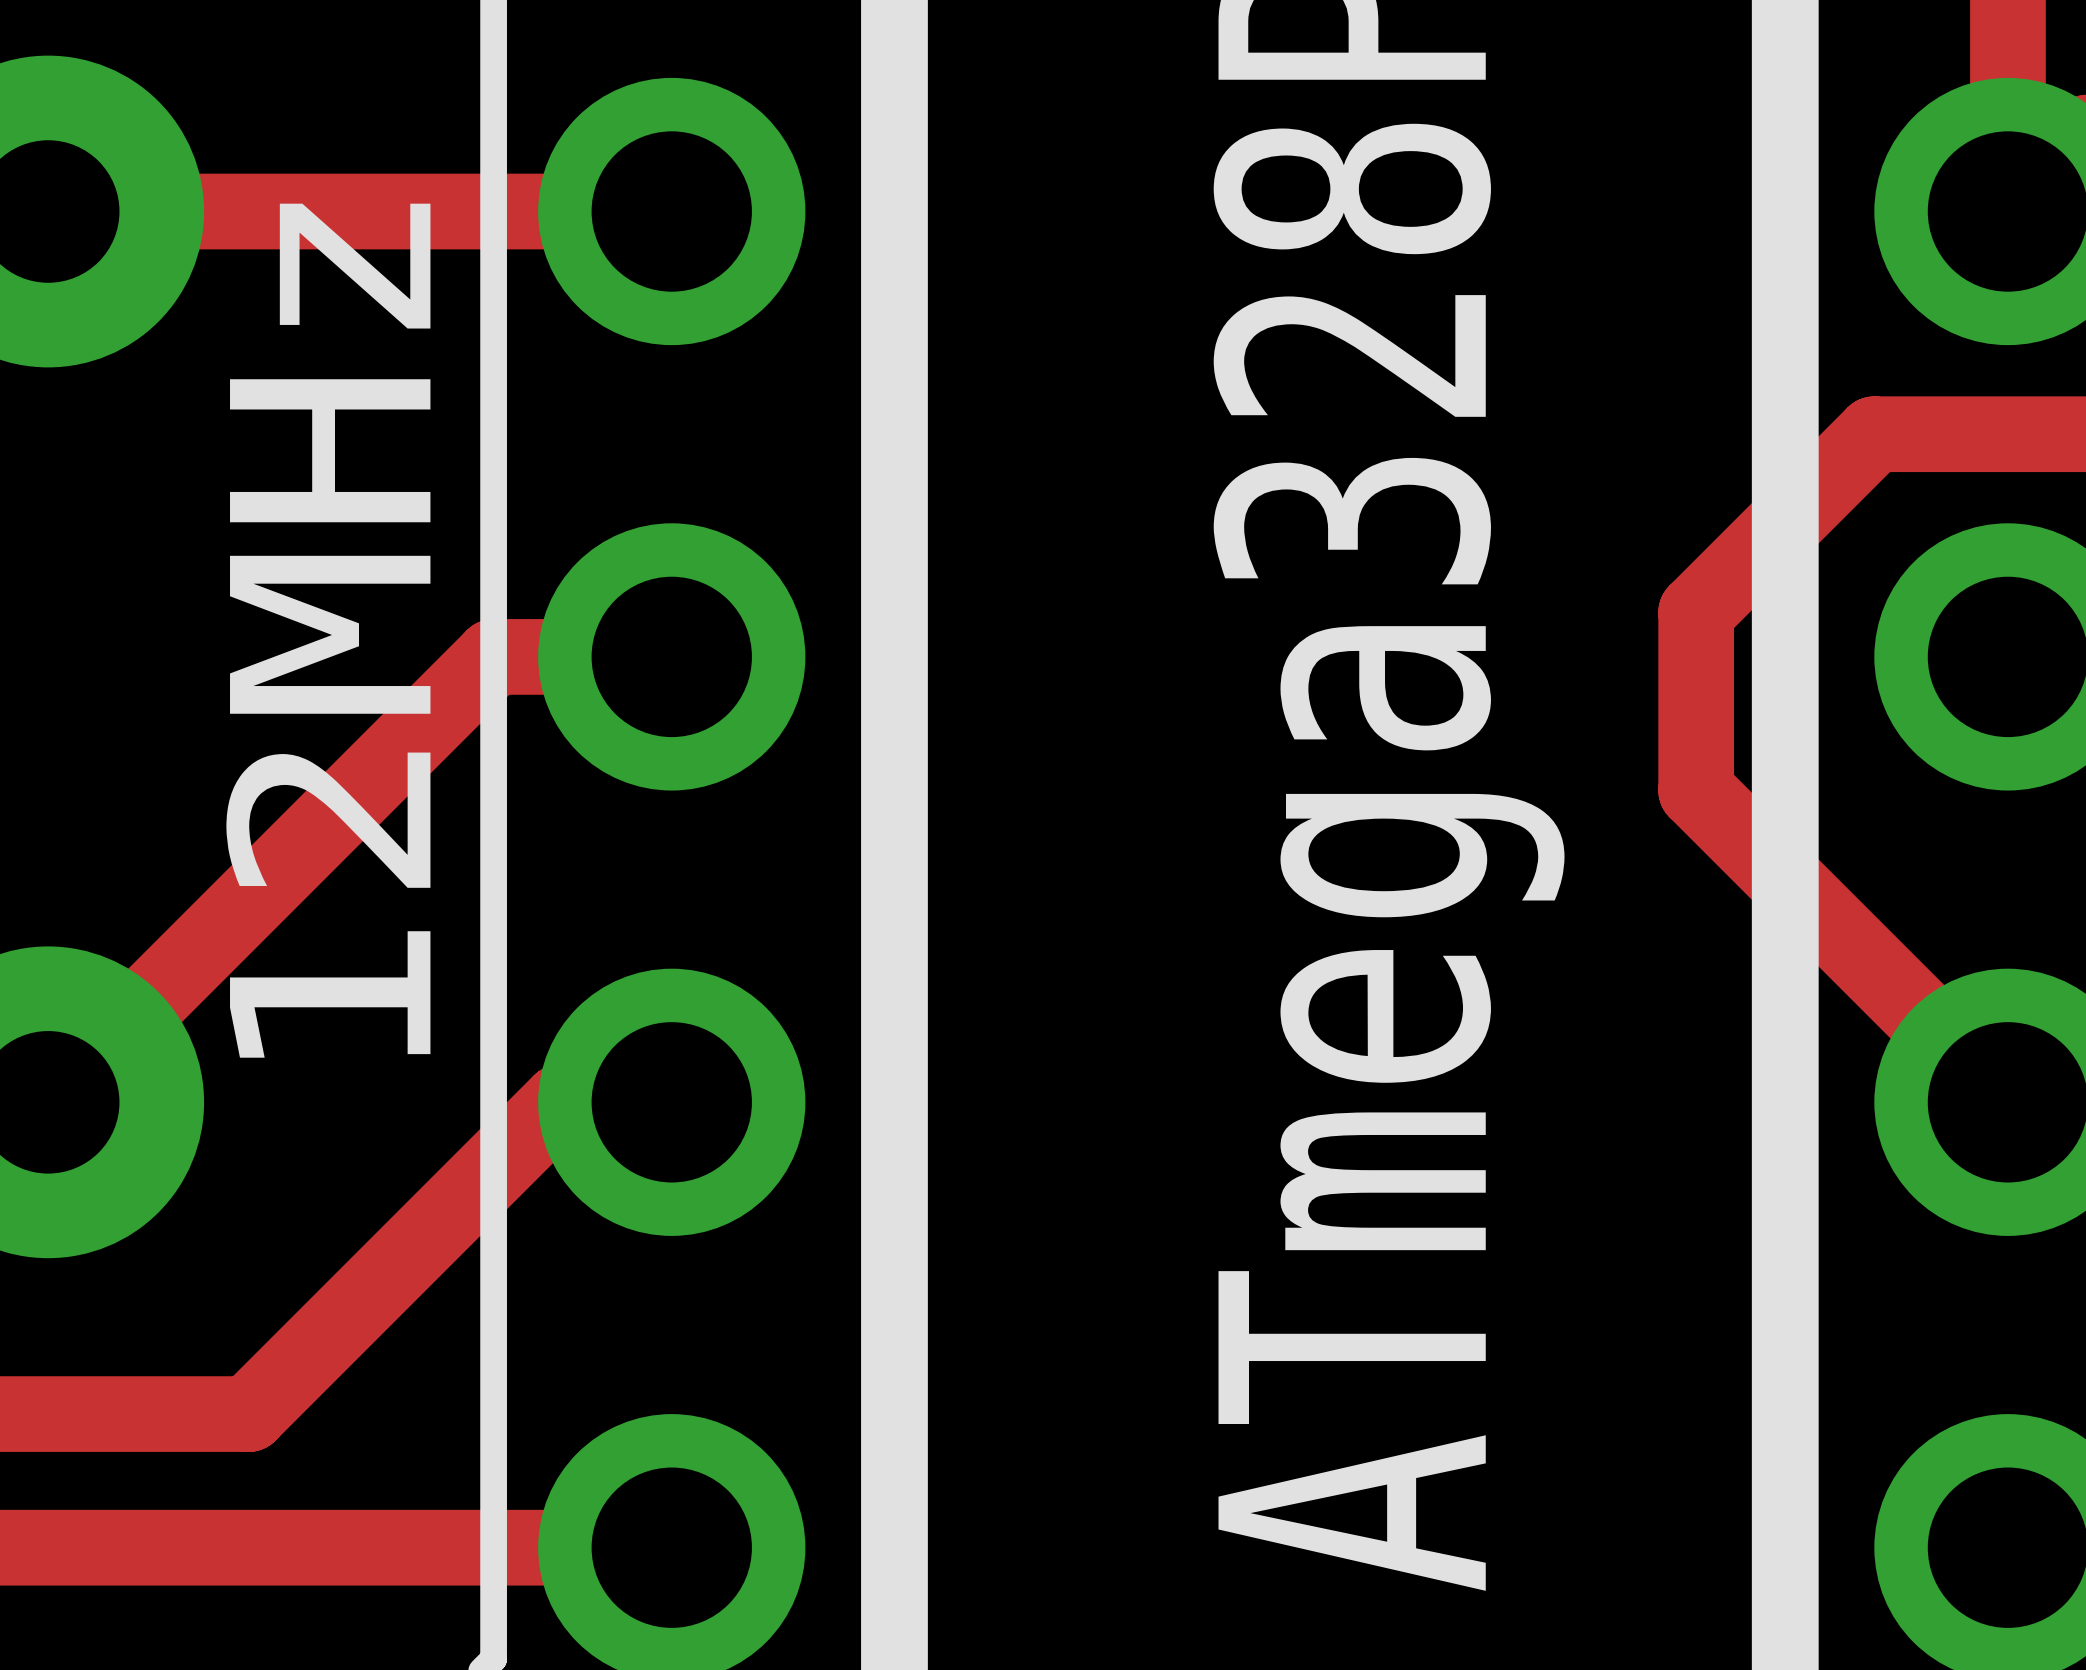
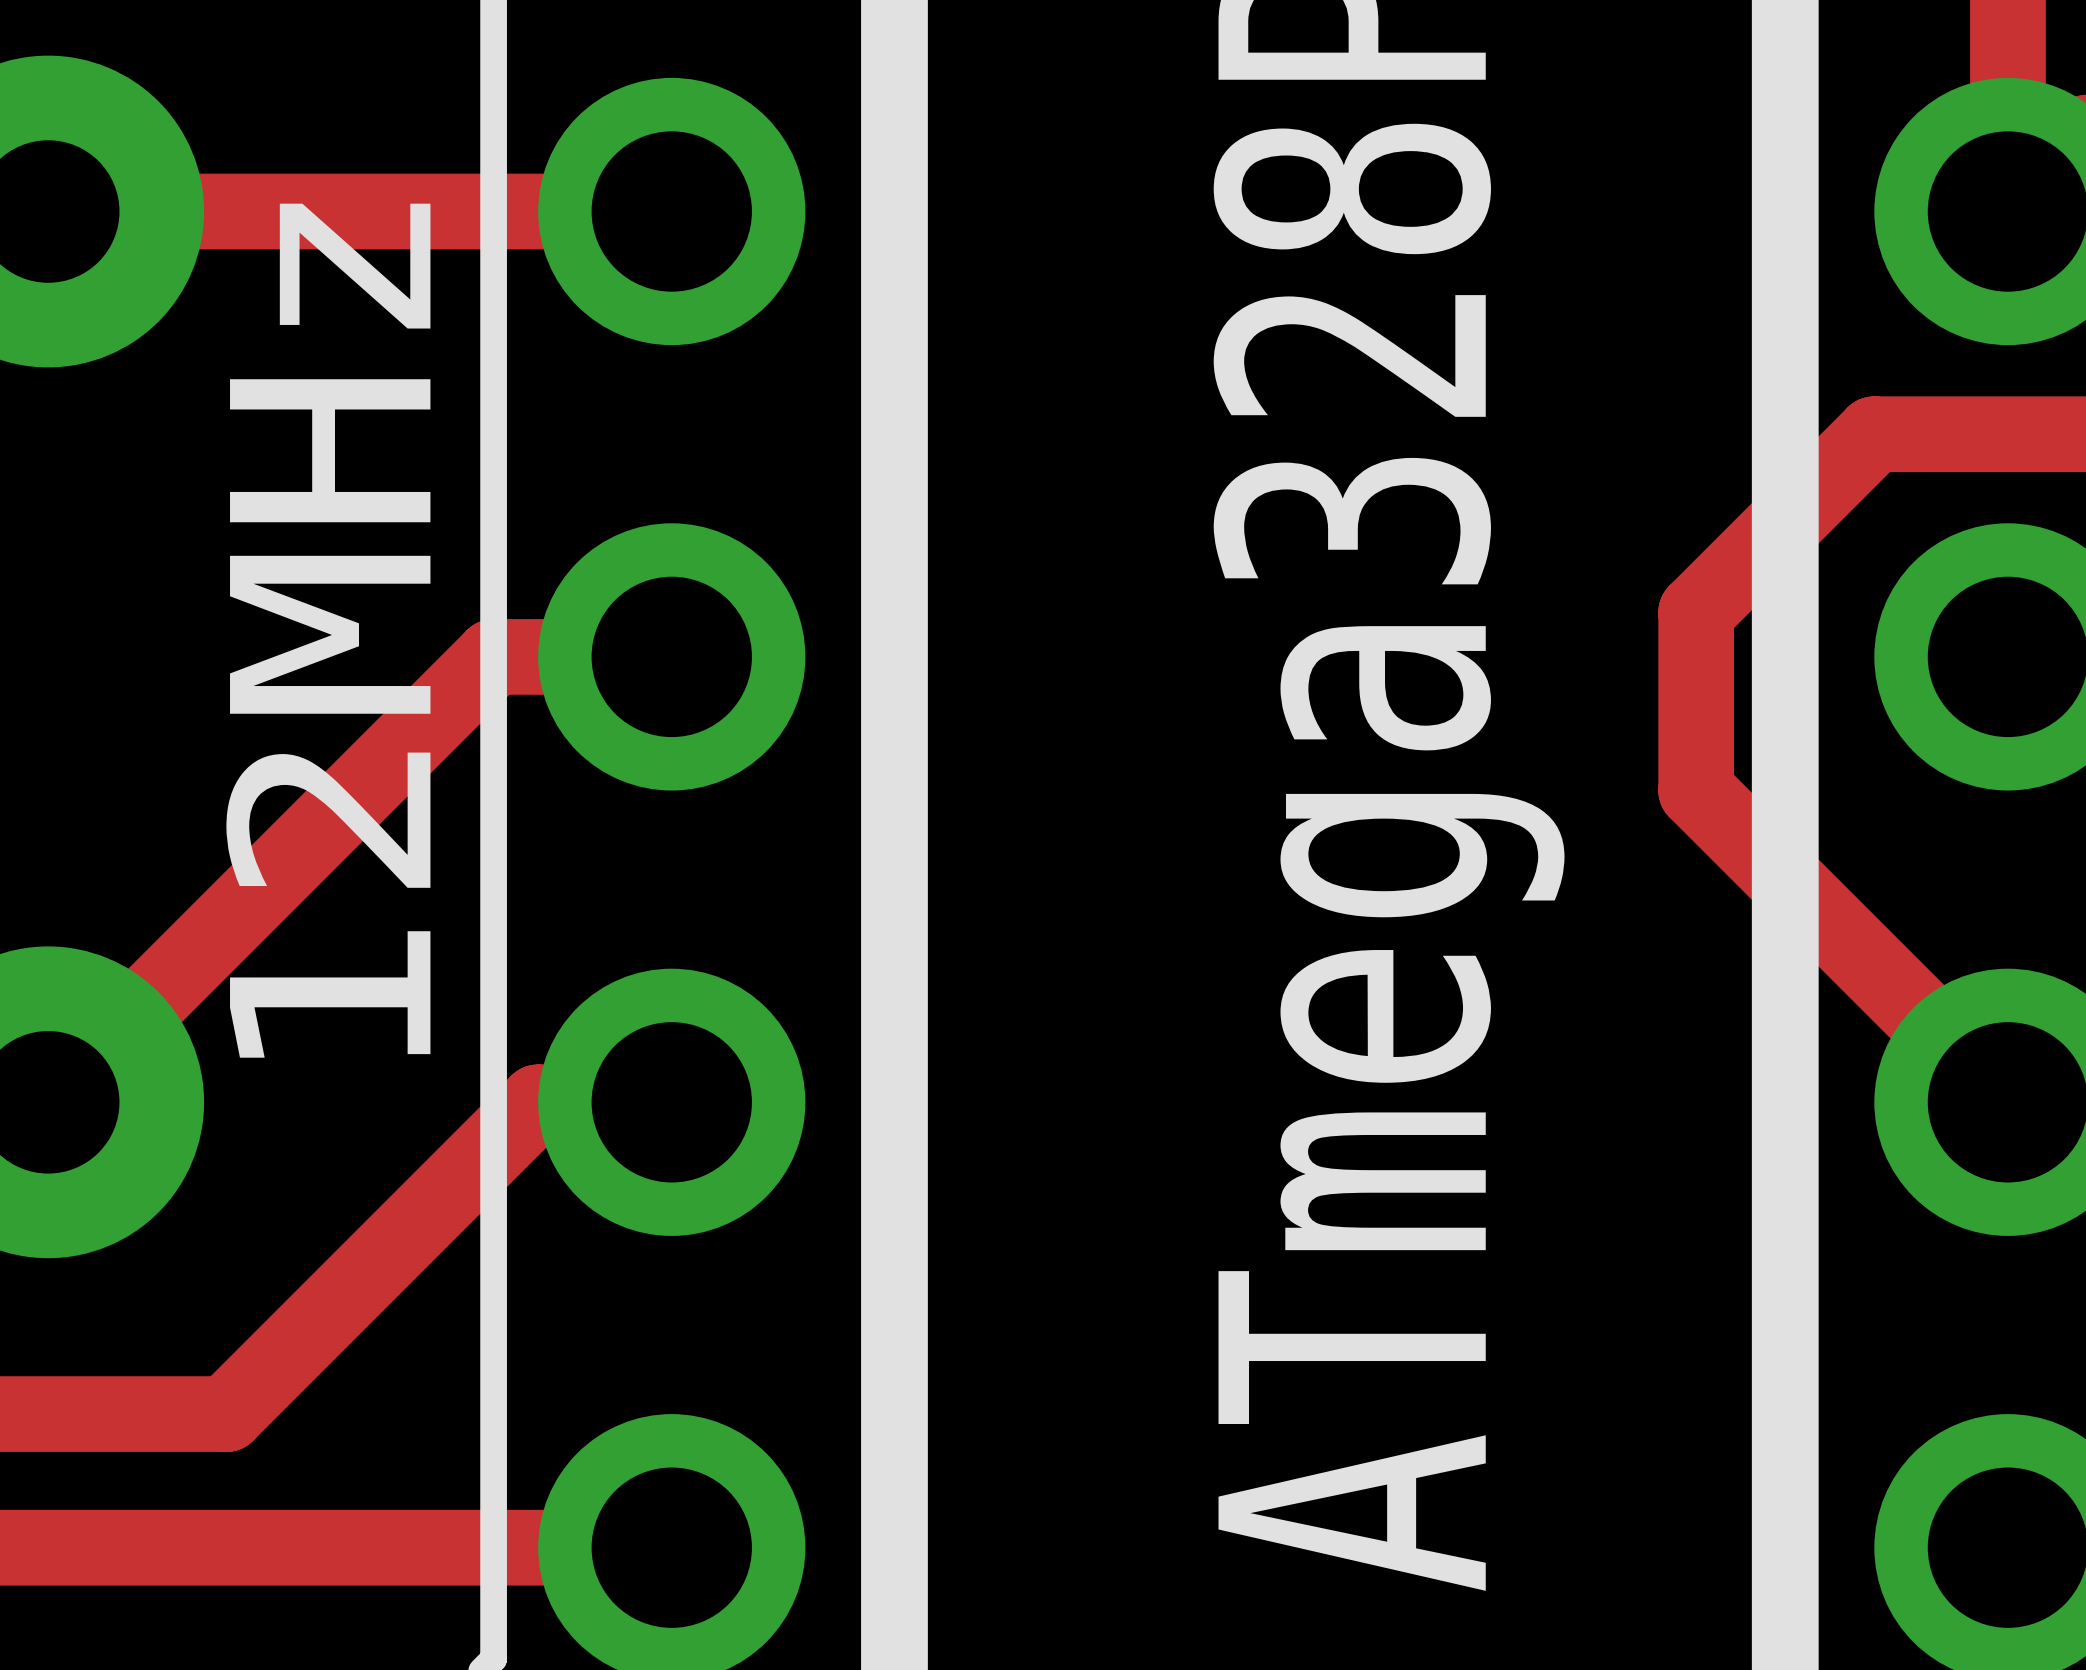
top track: (560, 1102) (248, 1414) (226, 1414) -> (560, 1102) (538, 1102) (226, 1414)

